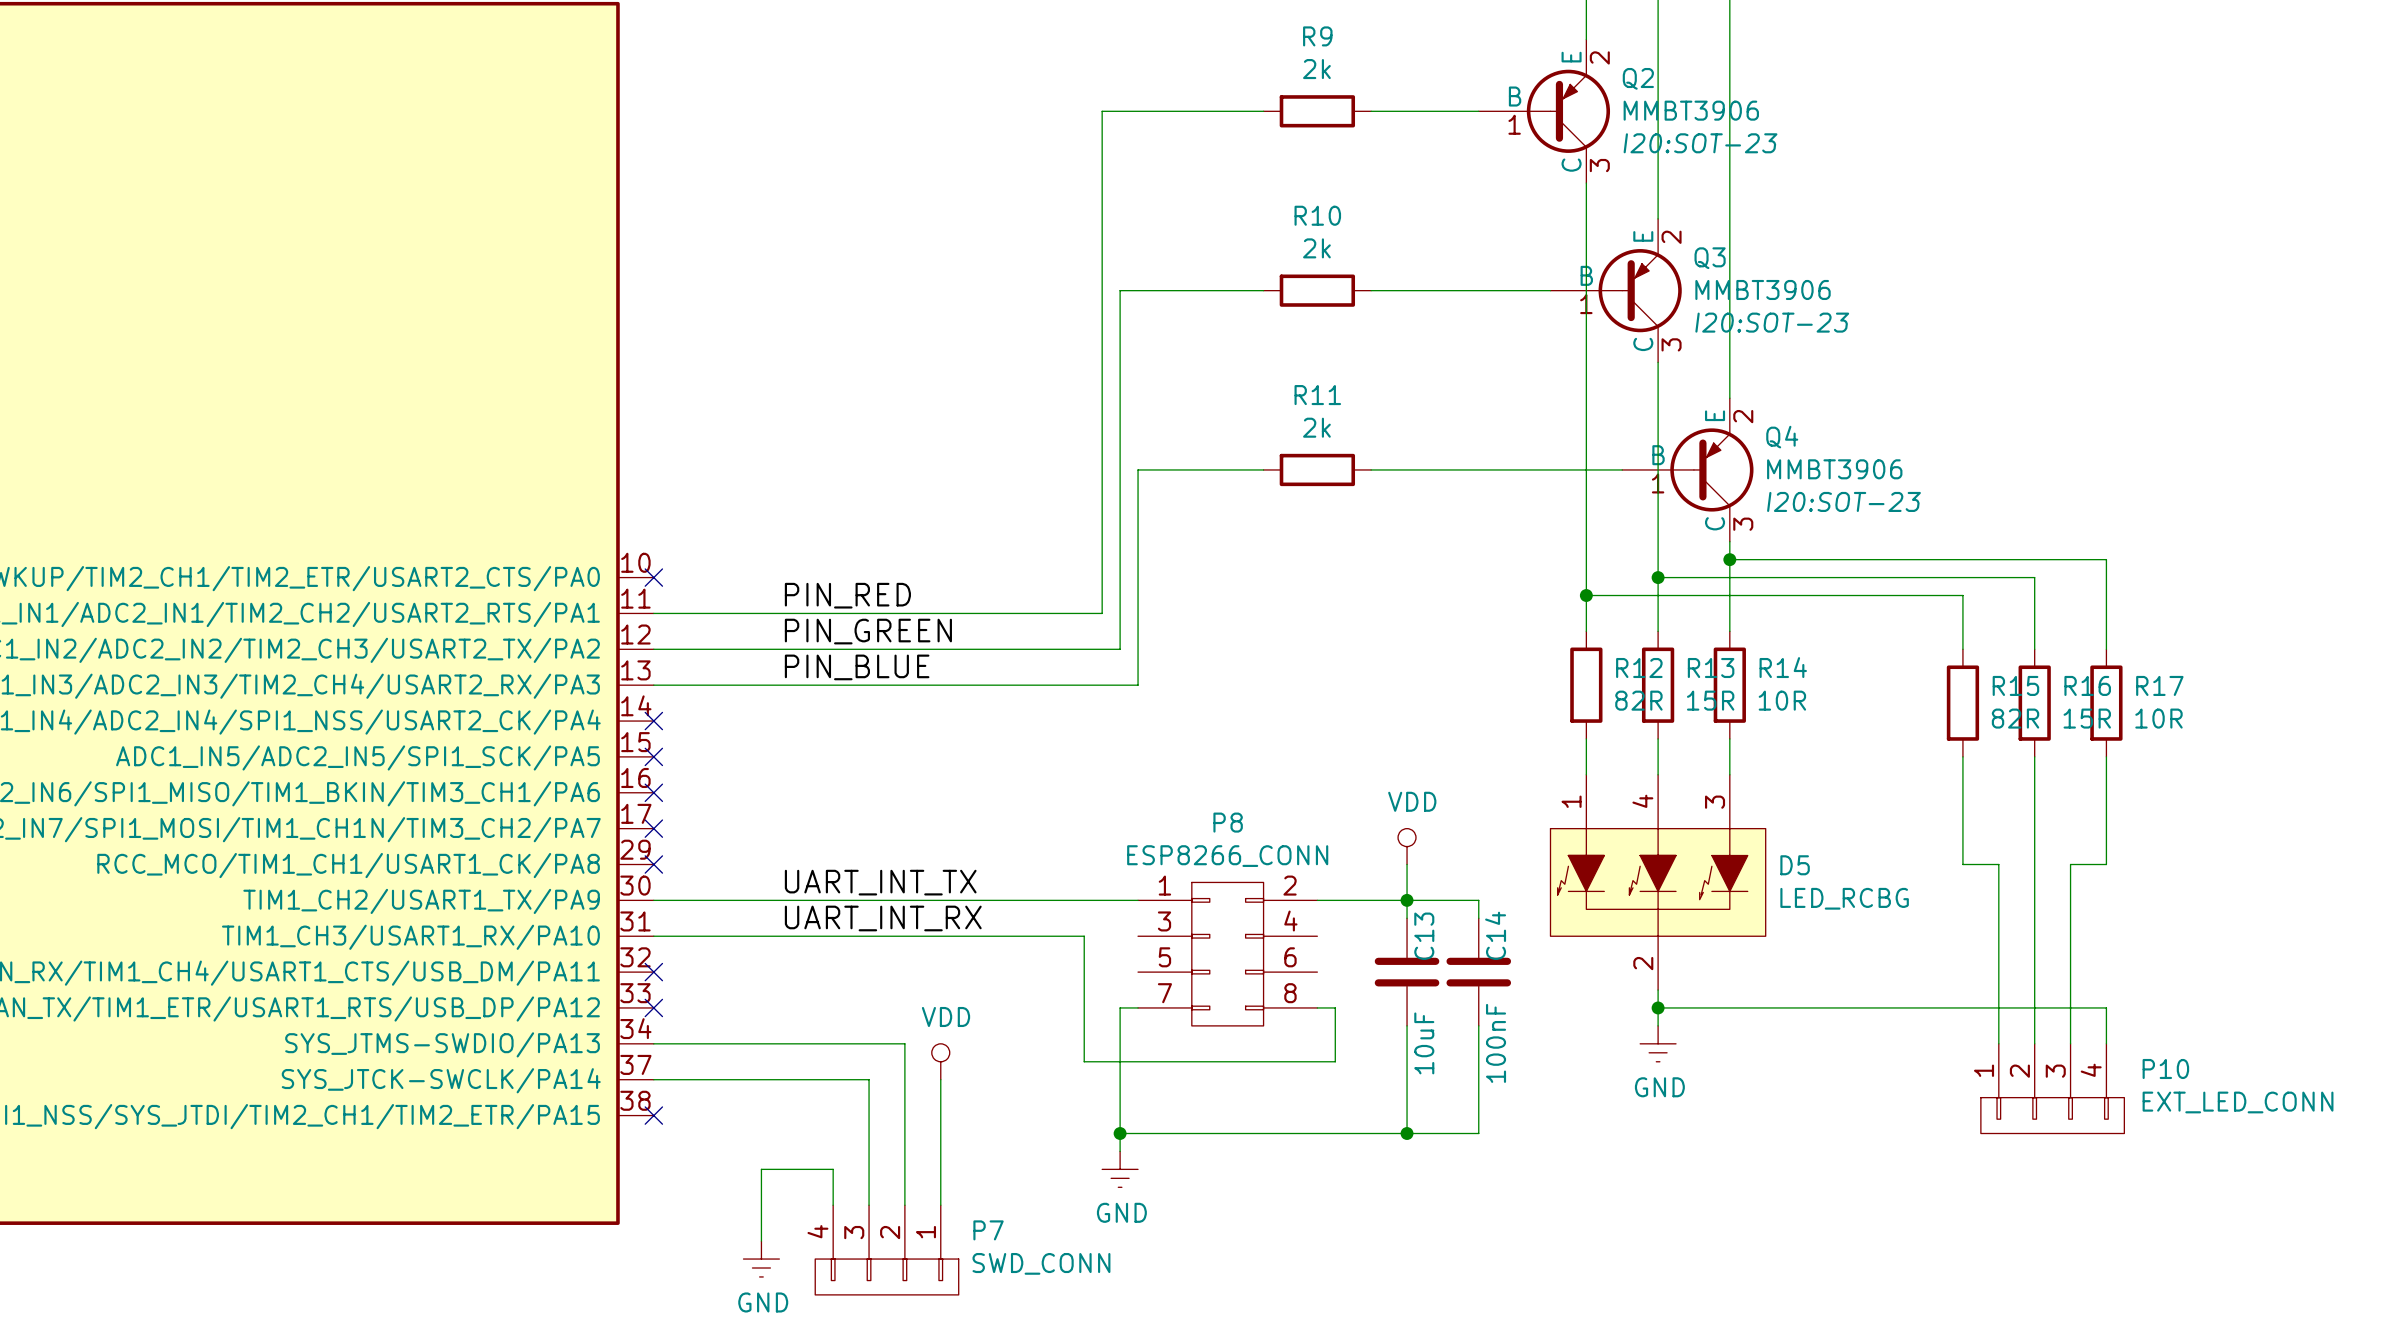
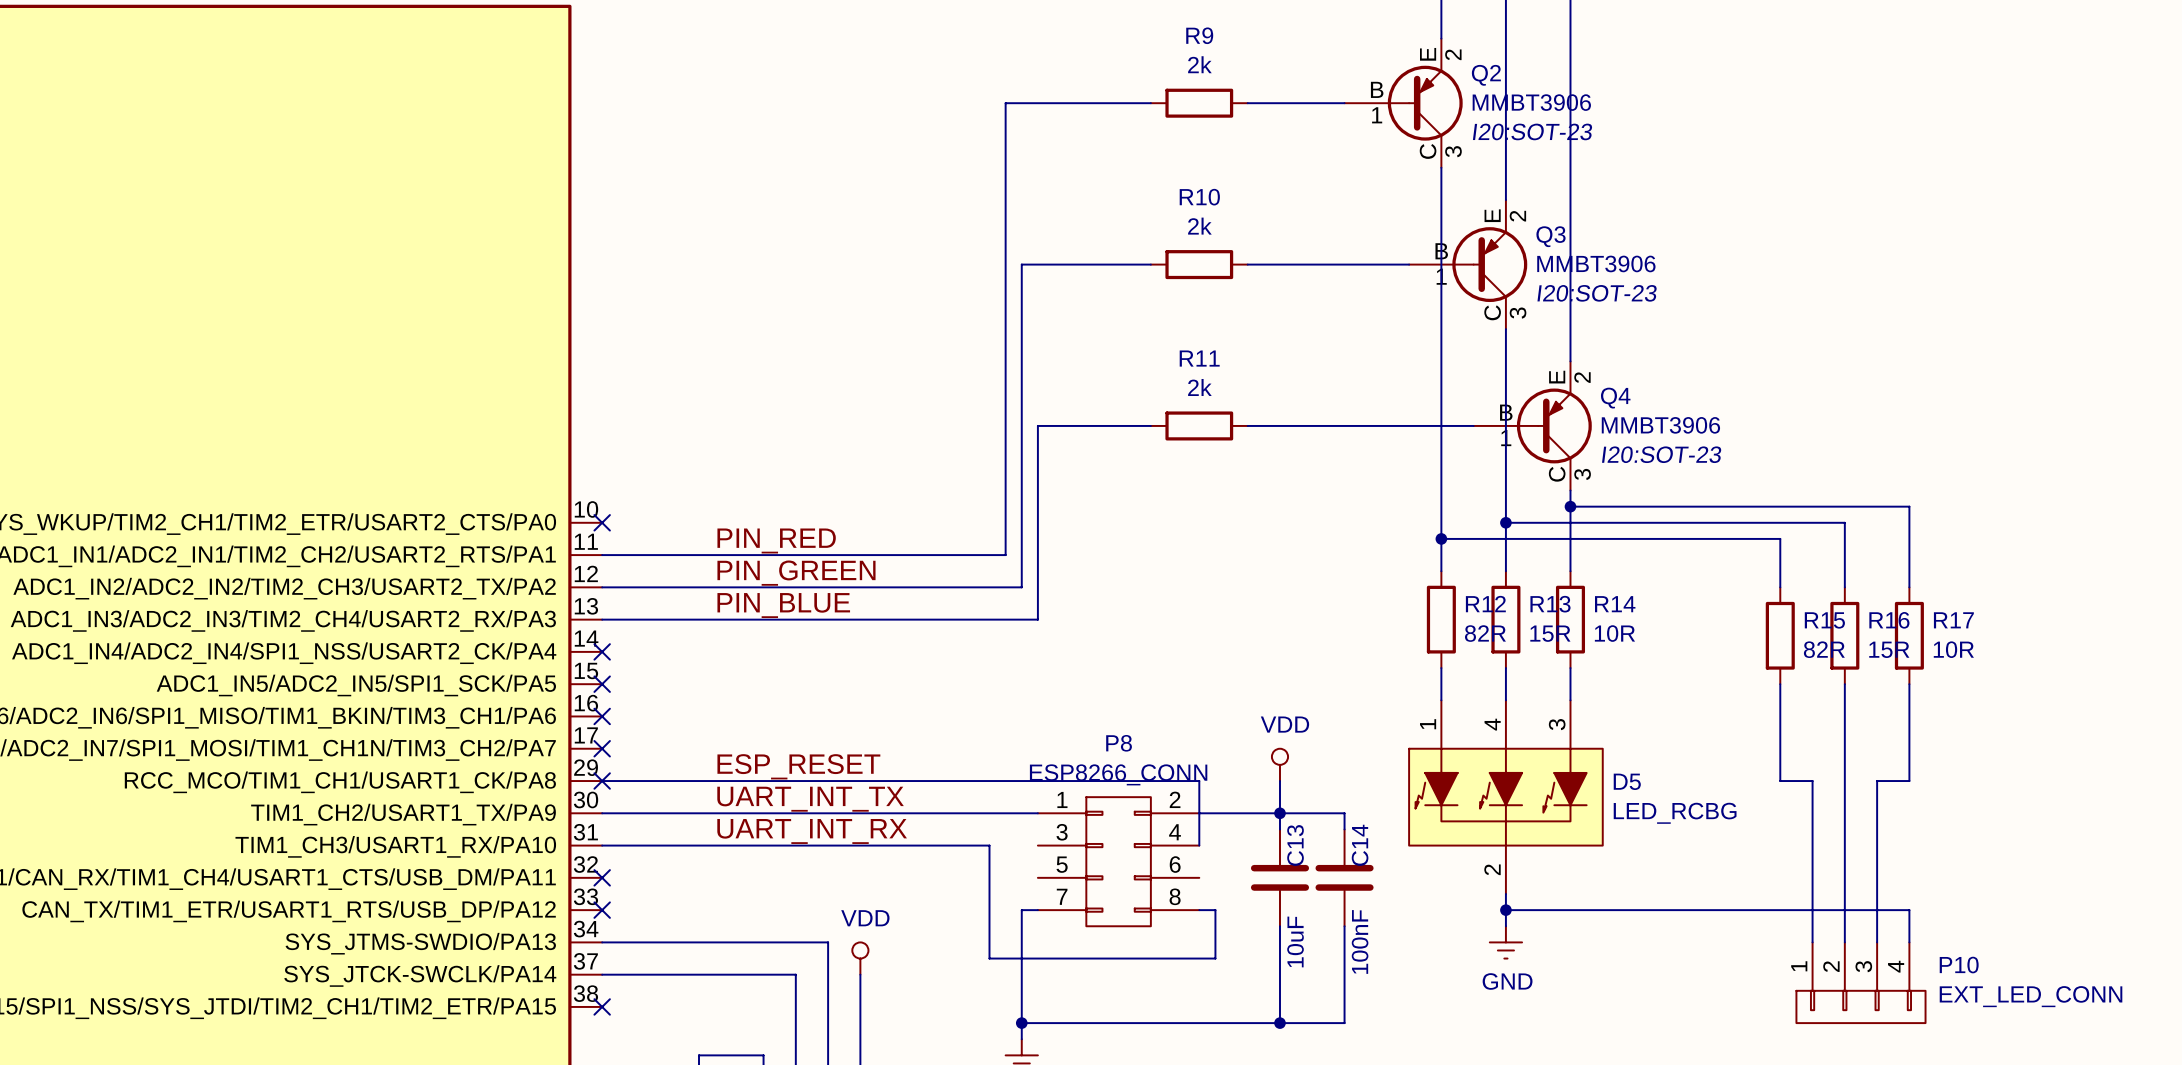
label: none -> ESP_RESET (798, 766)
wire: none -> (602, 781) (1199, 781) (1199, 845)

